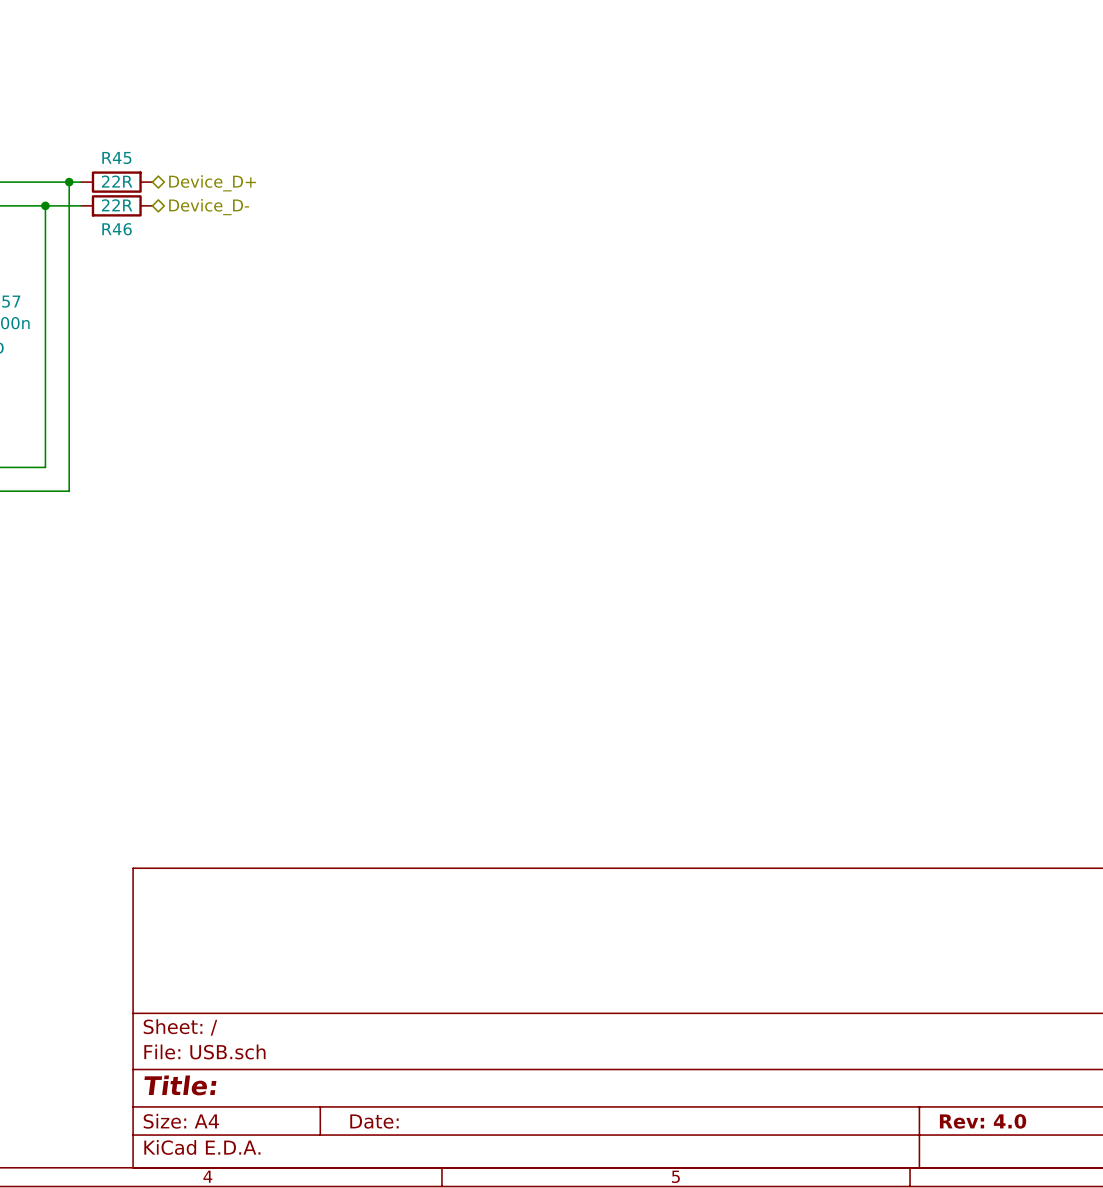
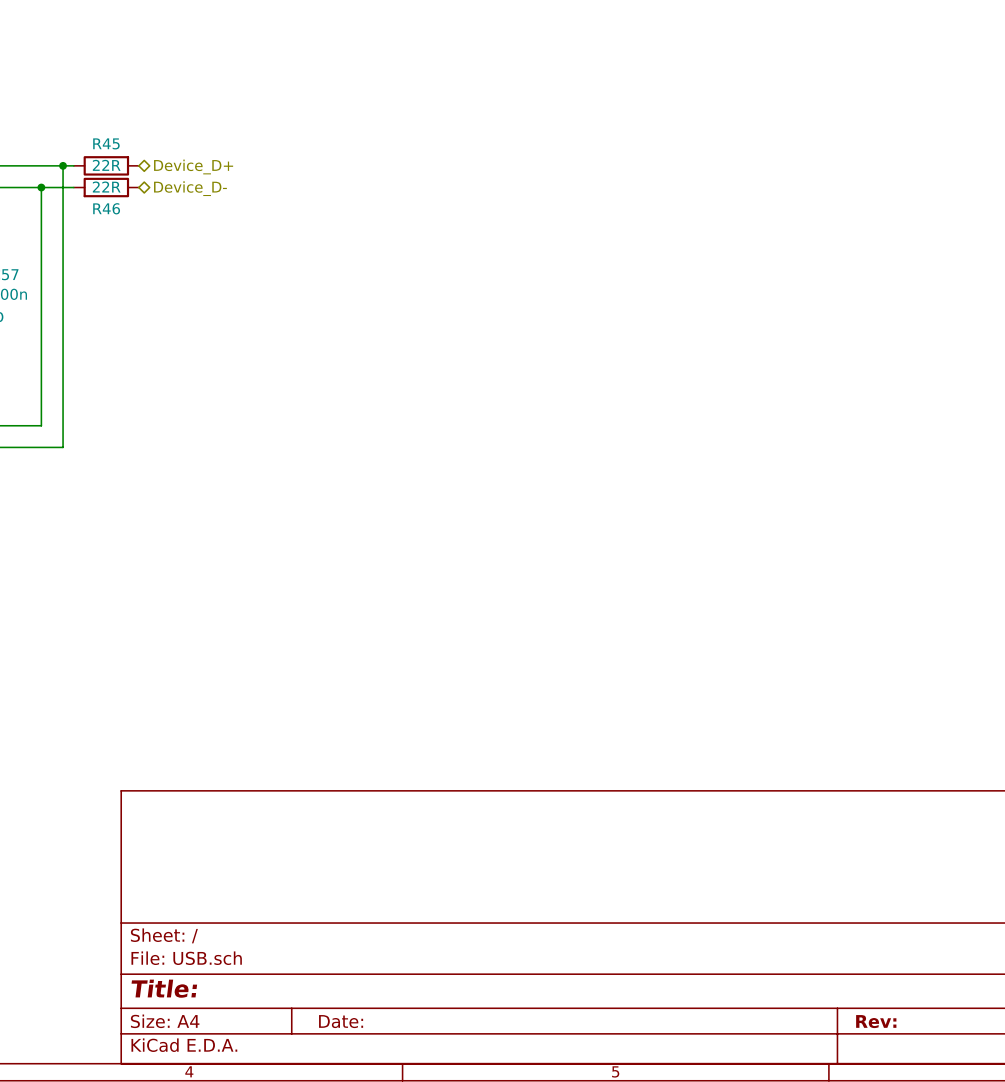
title block: Rev: 4.0 (983, 1121) -> Rev: (876, 1021)

